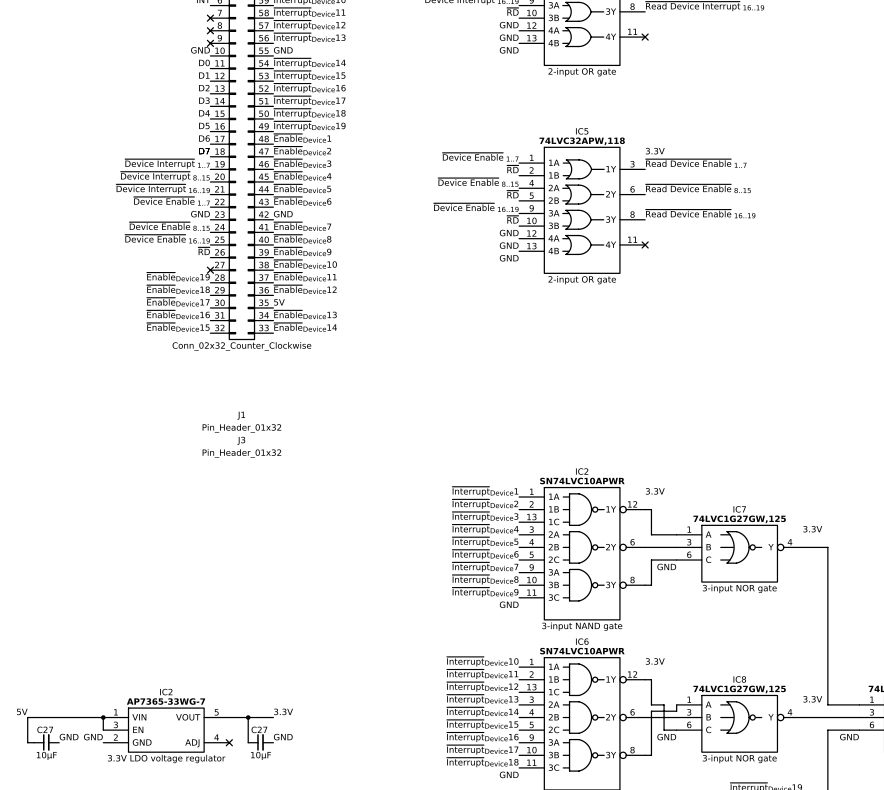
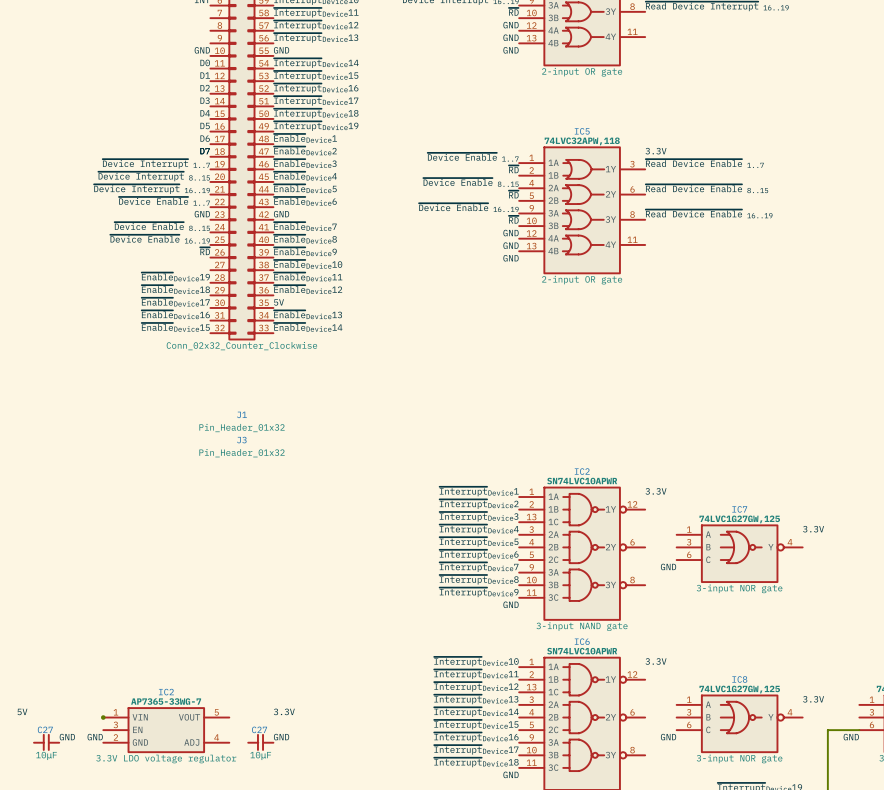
no-connect mark: (210, 18) -> none
no-connect mark: (210, 30) -> none
no-connect mark: (645, 37) -> none
no-connect mark: (210, 43) -> none
no-connect mark: (645, 244) -> none
no-connect mark: (210, 270) -> none
wire: (645, 509) (651, 509) (651, 534) (676, 534) -> none
wire: (645, 547) (676, 547) -> none
wire: (802, 547) (827, 547) (827, 704) (859, 704) -> none
wire: (676, 560) (651, 560) (651, 585) (645, 585) -> none
wire: (645, 679) (651, 679) (651, 704) (664, 704) (664, 730) (676, 730) -> none
wire: (676, 704) (676, 711) (651, 711) (651, 755) (645, 755) -> none
wire: (229, 717) (273, 717) -> none
wire: (248, 717) (248, 742) -> none
junction: (248, 717) -> none
wire: (645, 717) (676, 717) -> none
wire: (802, 717) (859, 717) -> none
wire: (103, 730) (103, 717) (27, 717) (27, 742) (33, 742) -> none
no-connect mark: (229, 742) -> none

